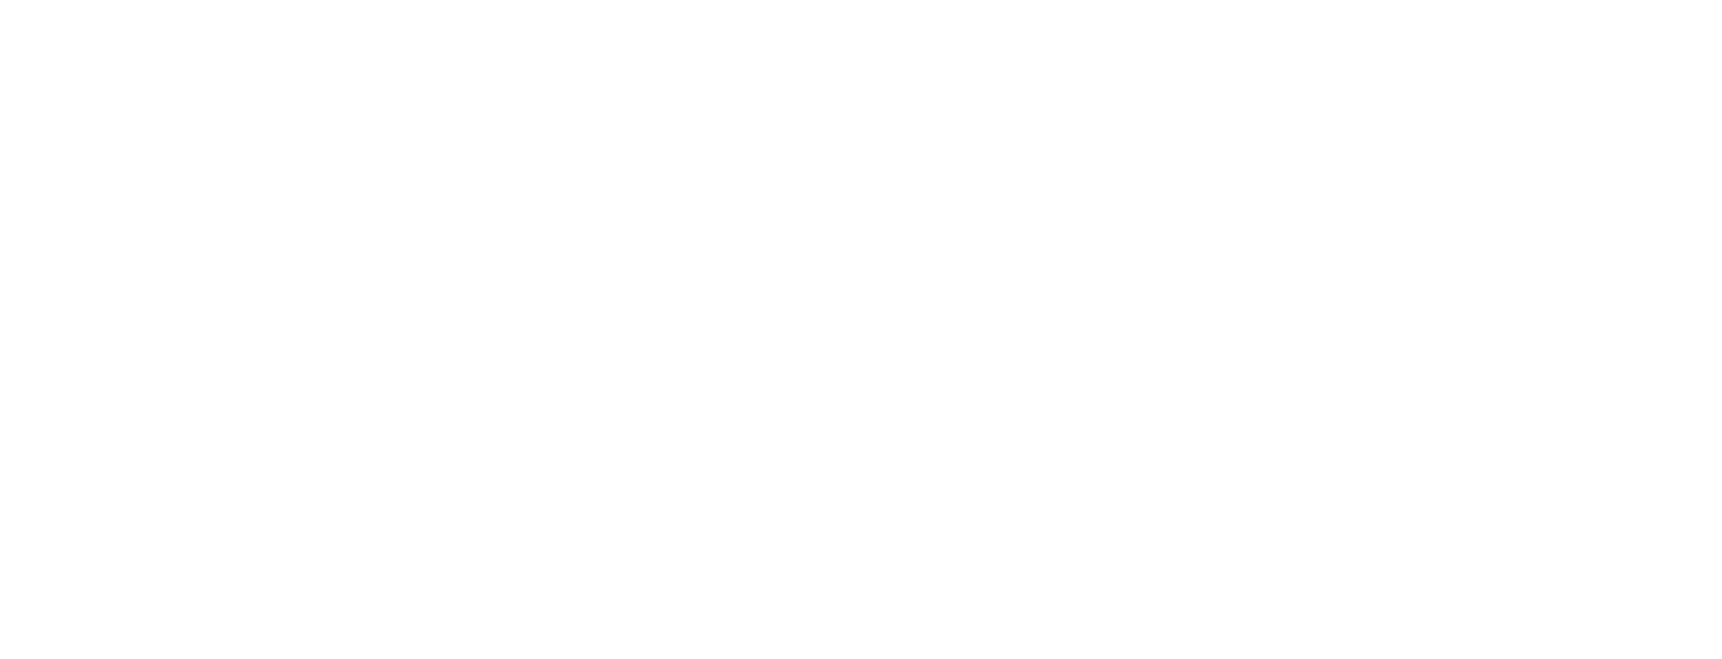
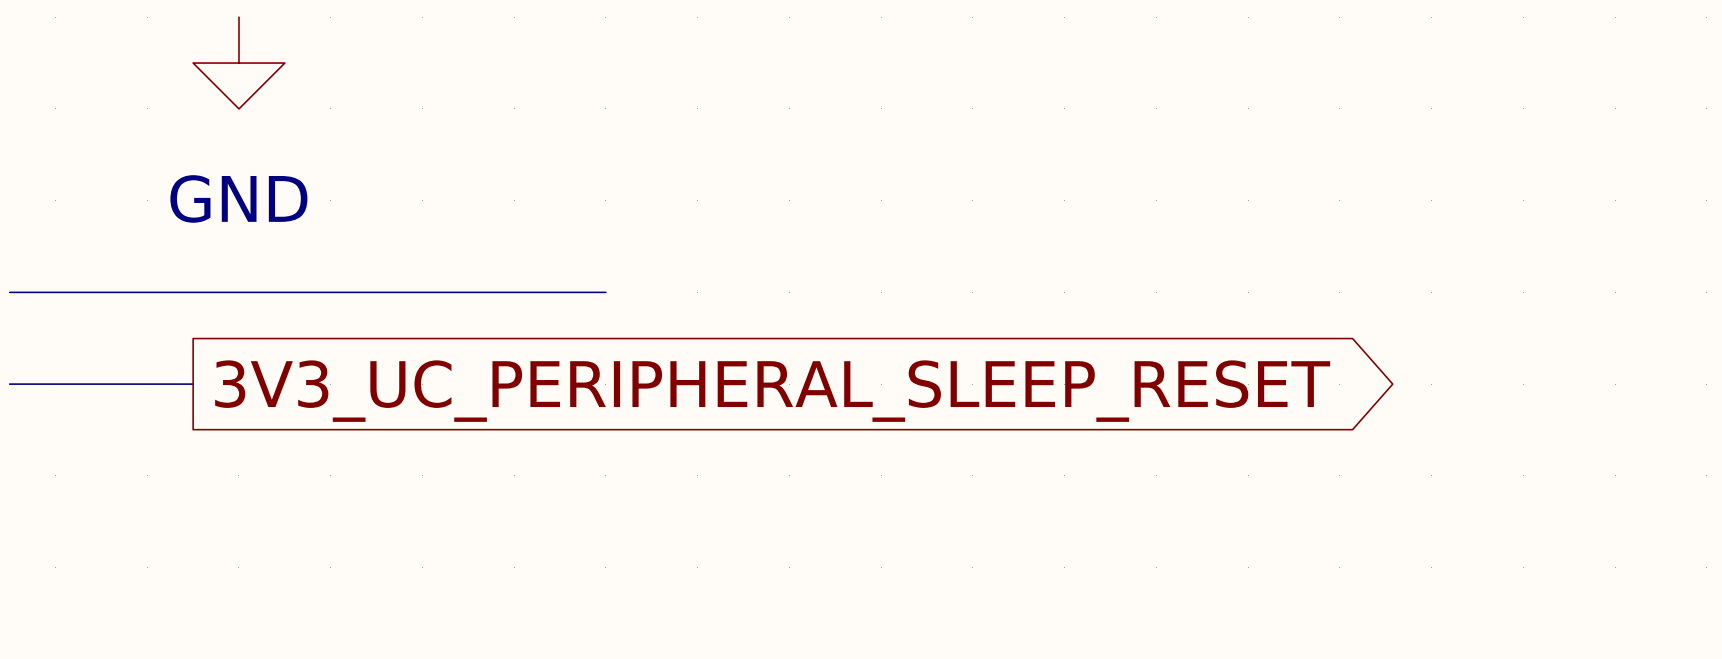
power symbol: none -> GND (238, 63)
wire: none -> (9, 292) (605, 292)
wire: none -> (9, 384) (193, 384)
global label: none -> 3V3_UC_PERIPHERAL_SLEEP_RESET (772, 391)

